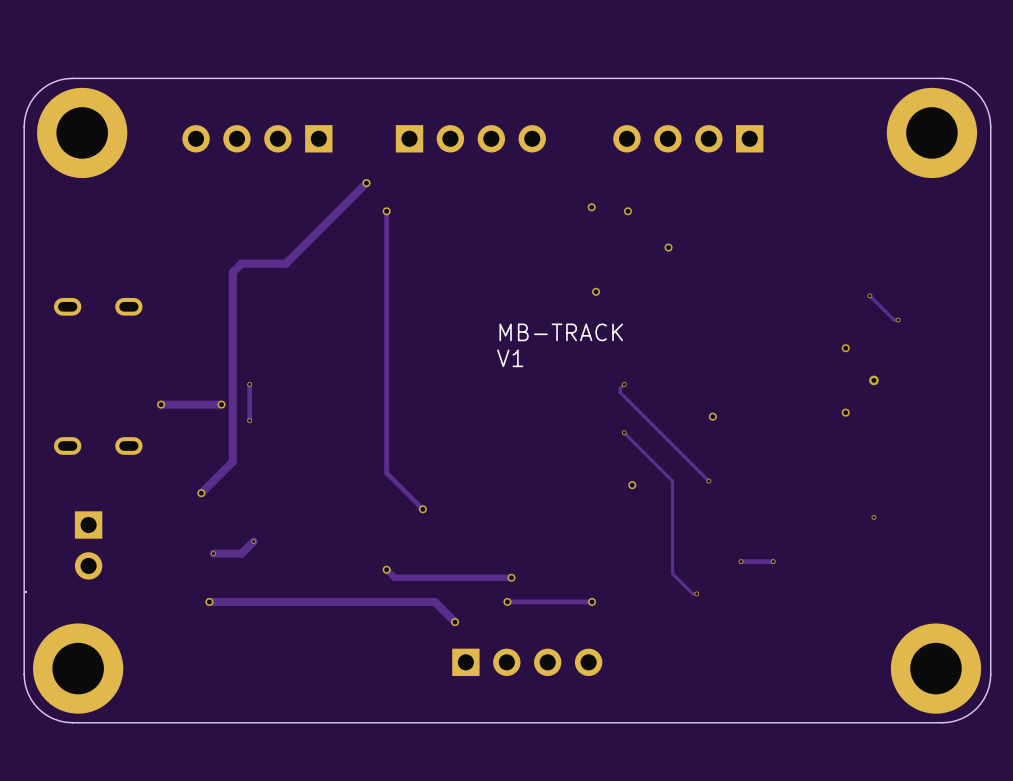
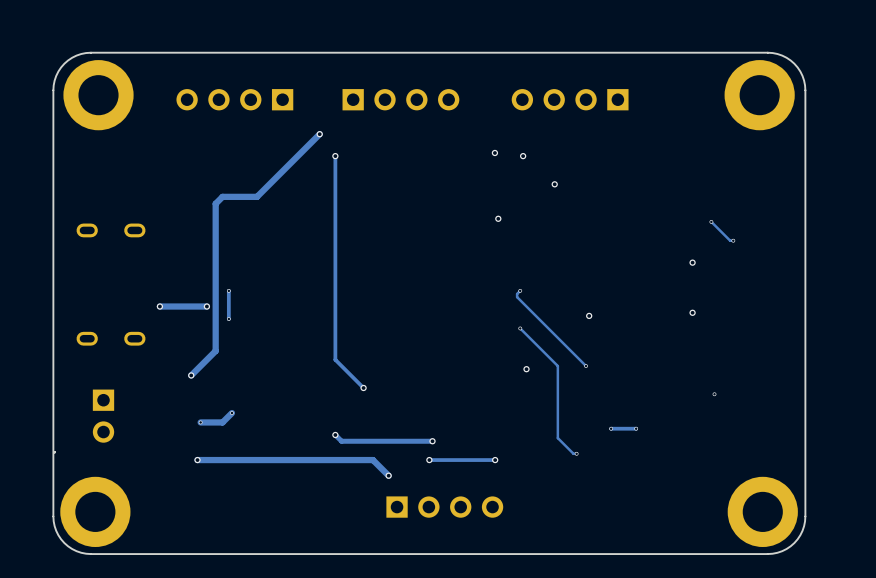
text: MB-TRACK (561, 332) -> none
text: V1 (510, 358) -> none
via: (873, 380) -> none

